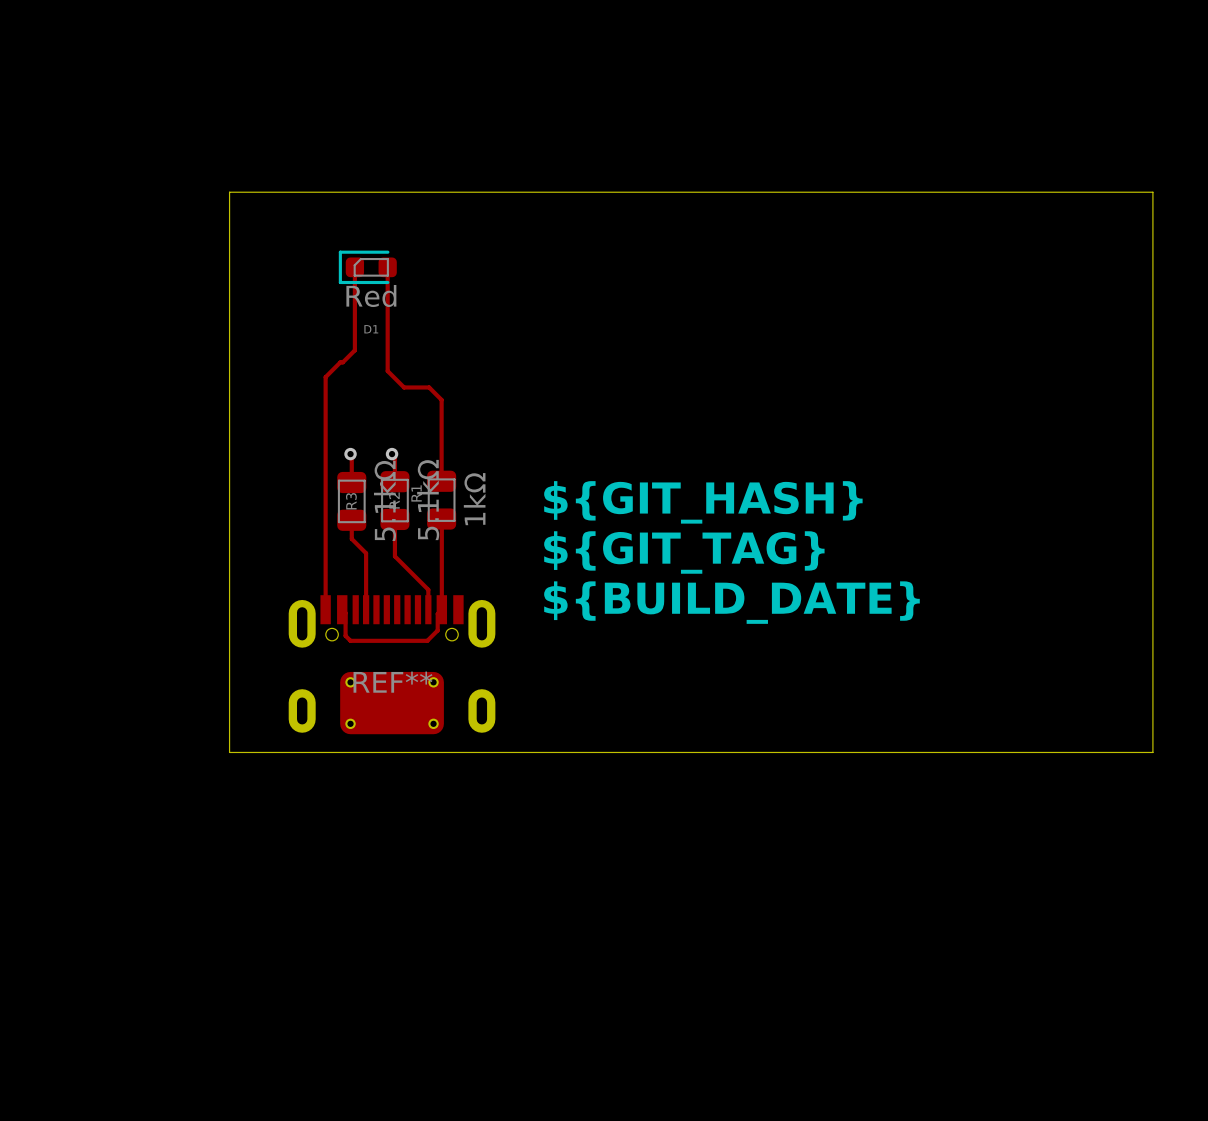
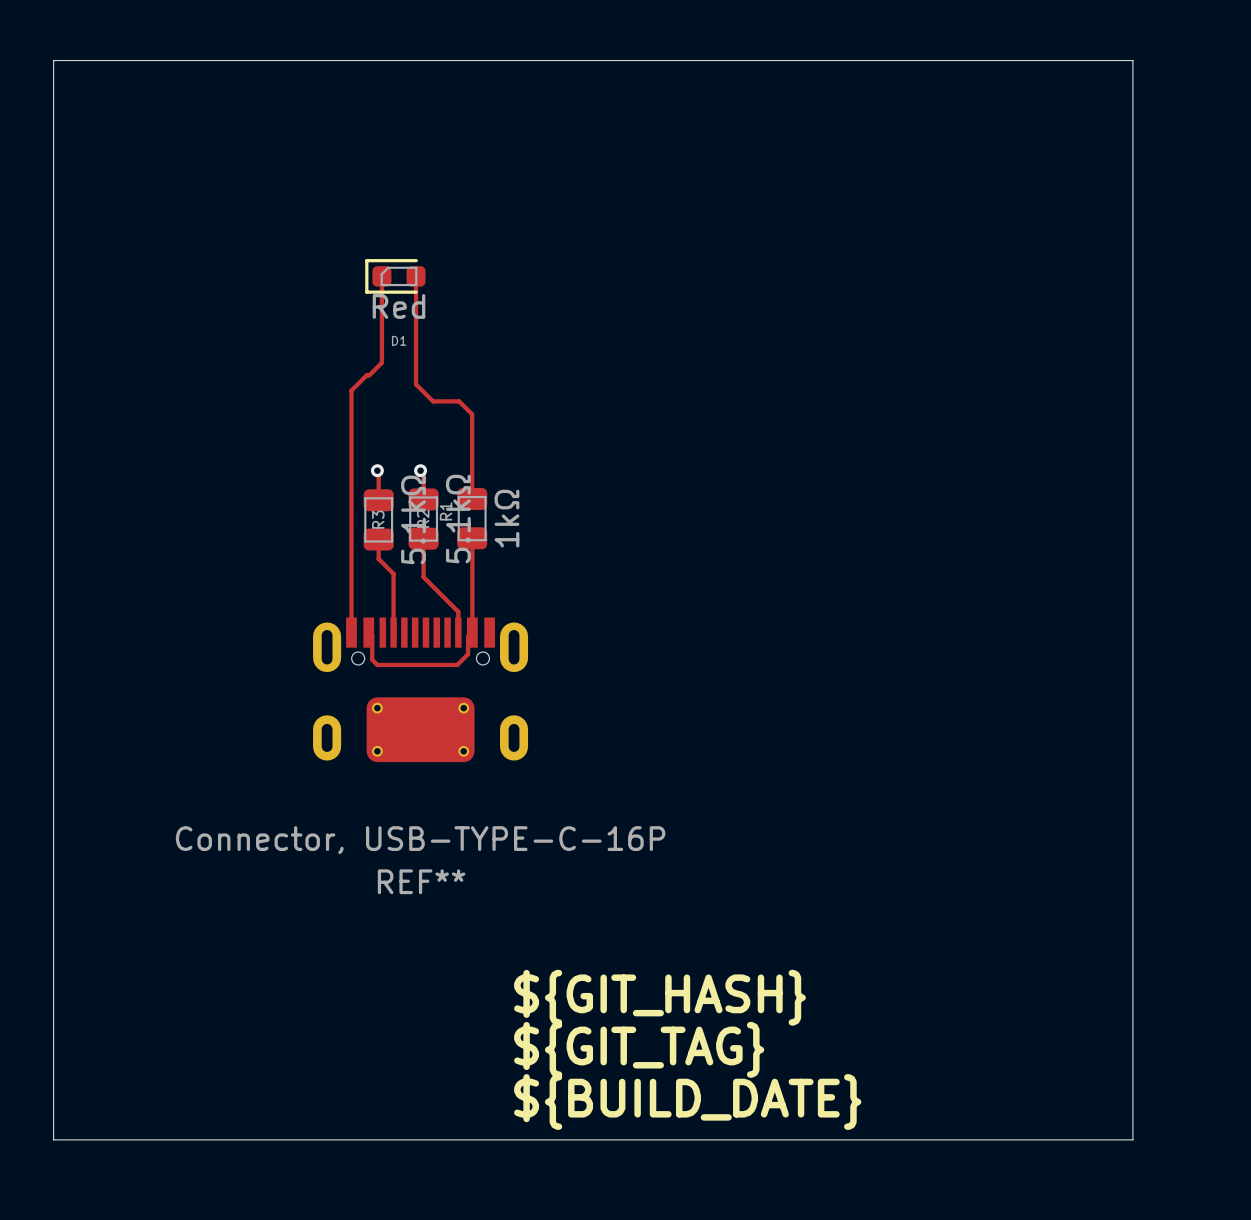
board edge: none -> (53, 60) (1132, 60) (1132, 1139) (53, 1139) (53, 60)
board edge: (229, 192) (1152, 192) (1152, 752) (229, 752) (229, 192) -> none
text position: ${GIT_HASH} (703, 502) -> ${GIT_HASH} (659, 997)
text position: ${GIT_TAG} (684, 552) -> ${GIT_TAG} (639, 1049)
text position: ${BUILD_DATE} (731, 602) -> ${BUILD_DATE} (687, 1101)
part text position: REF** (393, 682) -> REF** (421, 881)
part value: none -> Connector, USB-TYPE-C-16P (420, 840)

